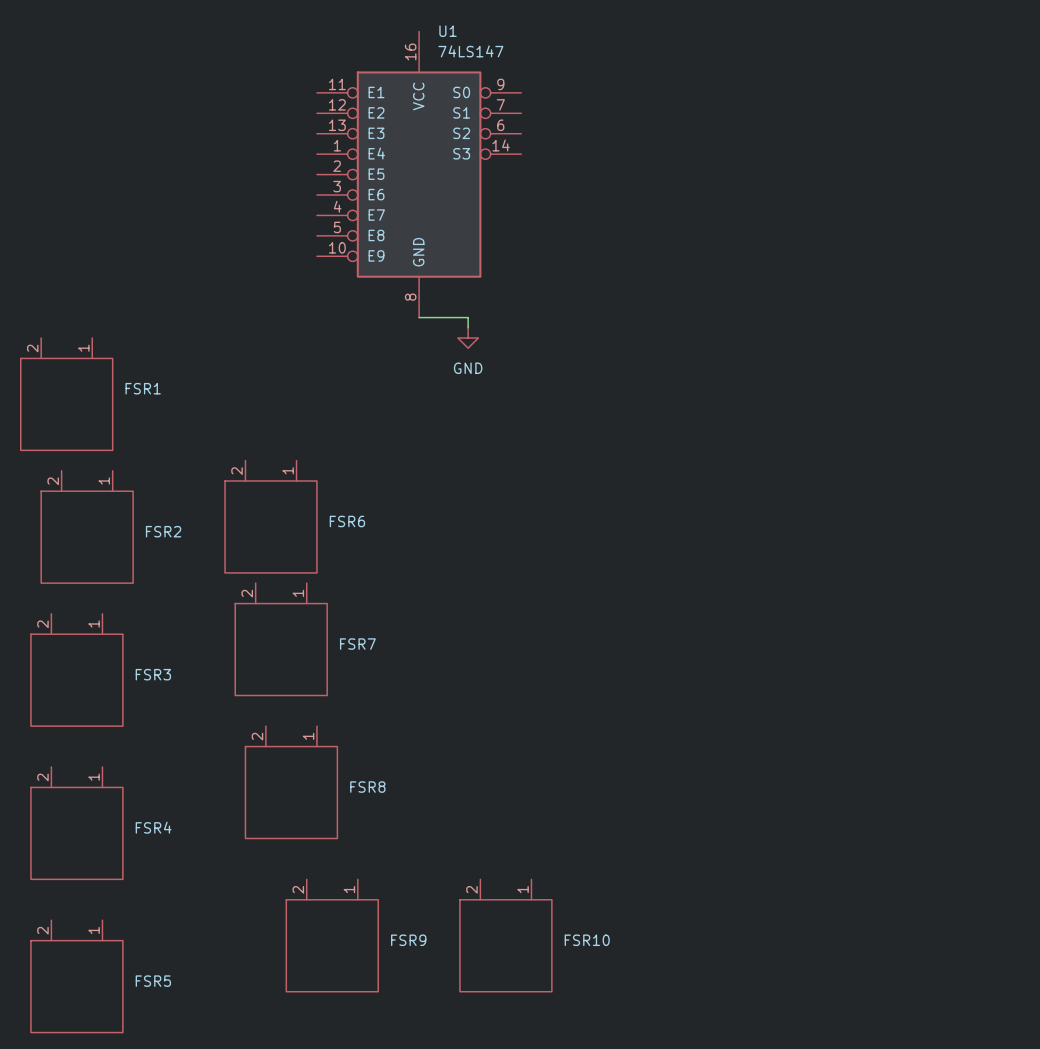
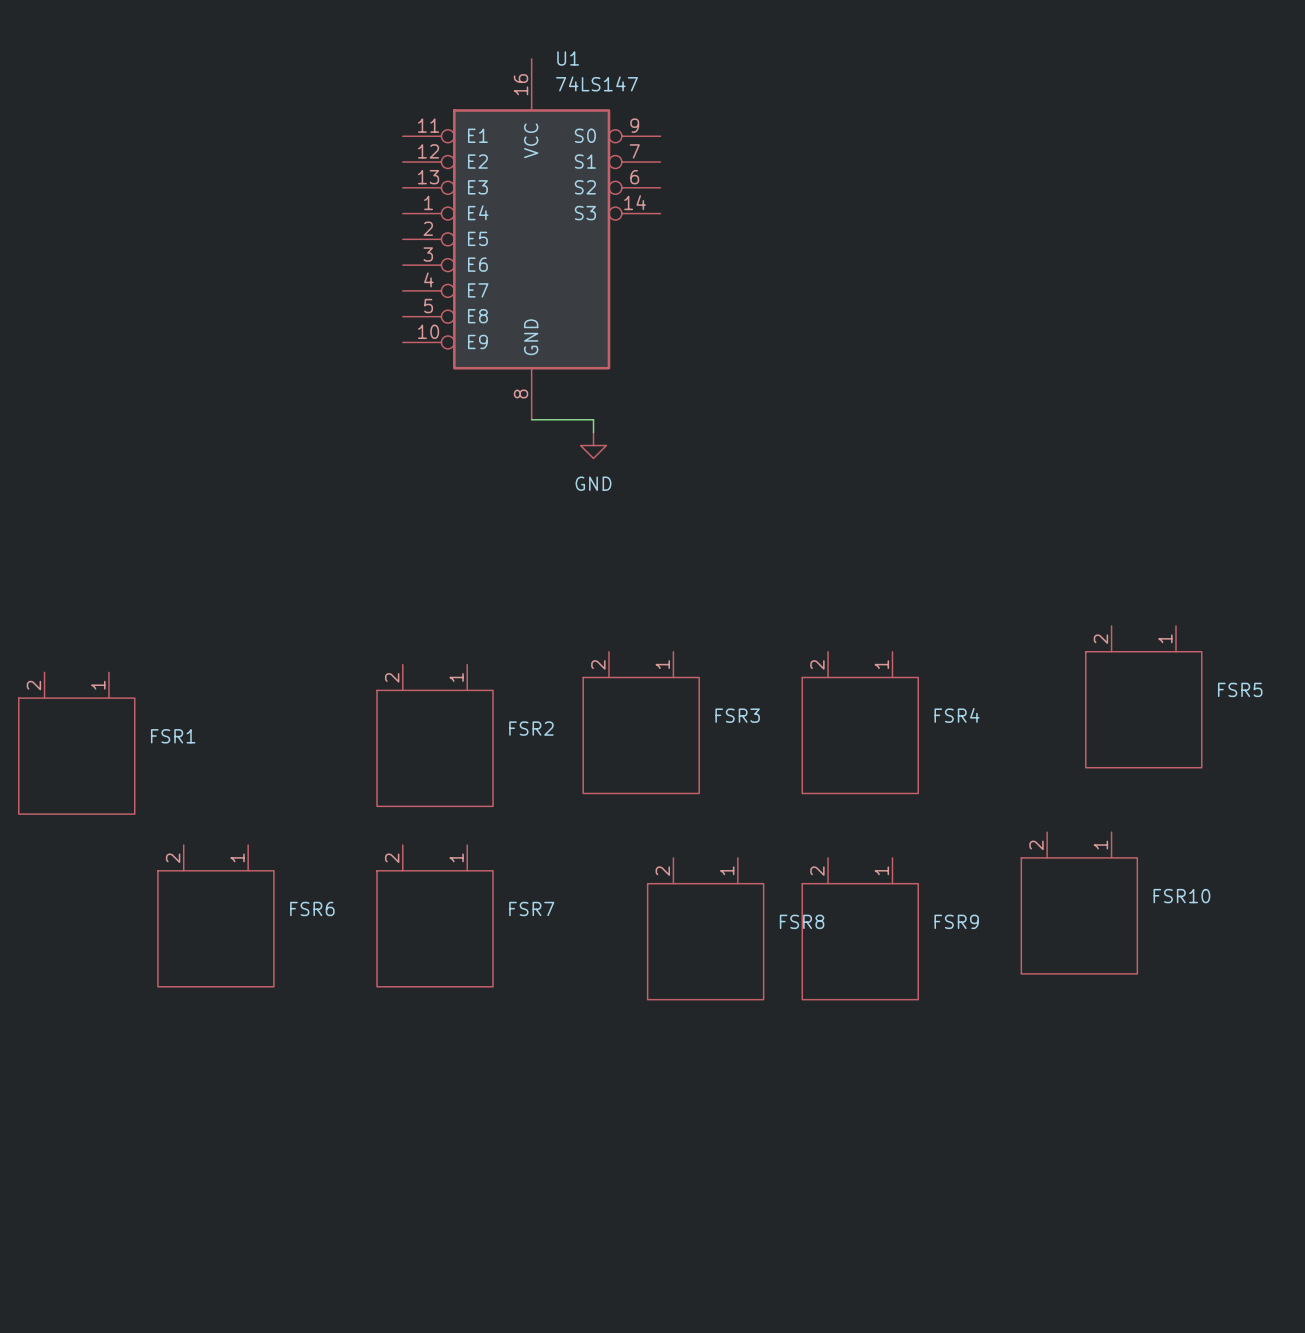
FSR1 pin number: 2 (32, 348) -> none
FSR1 pin number: 1 (83, 348) -> none
FSR1 position: (66, 394) -> (76, 743)
FSR6 pin number: 1 (288, 470) -> none
FSR6 pin number: 2 (237, 471) -> none
FSR2 pin number: 2 (53, 481) -> none
FSR2 pin number: 1 (104, 481) -> none
FSR5 pin number: none -> 2 (1100, 639)
FSR5 pin number: none -> 1 (1165, 638)
FSR3 pin number: none -> 2 (598, 664)
FSR3 pin number: none -> 1 (662, 664)
FSR4 pin number: none -> 2 (817, 664)
FSR4 pin number: none -> 1 (881, 664)
FSR6 position: (270, 516) -> (215, 915)
FSR6 name position: FSR6 (347, 521) -> FSR6 (312, 908)
FSR2 pin number: none -> 1 (456, 677)
FSR2 pin number: none -> 2 (392, 677)
FSR2 position: (87, 526) -> (435, 735)
FSR1 pin number: none -> 1 (98, 685)
FSR1 pin number: none -> 2 (33, 685)
FSR2 name position: FSR2 (163, 531) -> FSR2 (531, 728)
FSR7 pin number: 2 (247, 593) -> none
FSR7 pin number: 1 (298, 593) -> none
FSR3 pin number: 2 (42, 624) -> none
FSR3 pin number: 1 (94, 624) -> none
FSR7 position: (281, 639) -> (435, 915)
FSR7 name position: FSR7 (357, 644) -> FSR7 (531, 908)
FSR10 pin number: none -> 2 (1036, 845)
FSR10 pin number: none -> 1 (1100, 845)
FSR6 pin number: none -> 1 (237, 857)
FSR7 pin number: none -> 1 (456, 857)
FSR6 pin number: none -> 2 (173, 858)
FSR7 pin number: none -> 2 (392, 858)
FSR3 position: (76, 669) -> (641, 722)
FSR3 name position: FSR3 (153, 674) -> FSR3 (737, 715)
FSR8 pin number: none -> 2 (662, 871)
FSR8 pin number: none -> 1 (727, 870)
FSR9 pin number: none -> 2 (817, 871)
FSR9 pin number: none -> 1 (881, 870)
FSR8 pin number: 2 (257, 736) -> none
FSR8 pin number: 1 (308, 736) -> none
FSR4 pin number: 2 (42, 777) -> none
FSR4 pin number: 1 (94, 777) -> none
FSR8 position: (291, 782) -> (705, 928)
FSR8 name position: FSR8 (367, 787) -> FSR8 (802, 921)
FSR4 position: (76, 823) -> (860, 722)
FSR4 name position: FSR4 (153, 827) -> FSR4 (957, 715)
FSR9 pin number: 2 (298, 889) -> none
FSR9 pin number: 1 (349, 889) -> none
FSR10 pin number: 2 (471, 889) -> none
FSR10 pin number: 1 (523, 889) -> none
FSR5 pin number: 2 (42, 930) -> none
FSR5 pin number: 1 (94, 930) -> none
FSR9 position: (332, 935) -> (860, 928)
FSR10 position: (505, 935) -> (1079, 903)
FSR9 name position: FSR9 (408, 940) -> FSR9 (956, 921)
FSR10 name position: FSR10 (587, 940) -> FSR10 (1181, 896)
FSR5 position: (76, 976) -> (1143, 696)
FSR5 name position: FSR5 (153, 981) -> FSR5 (1240, 689)

